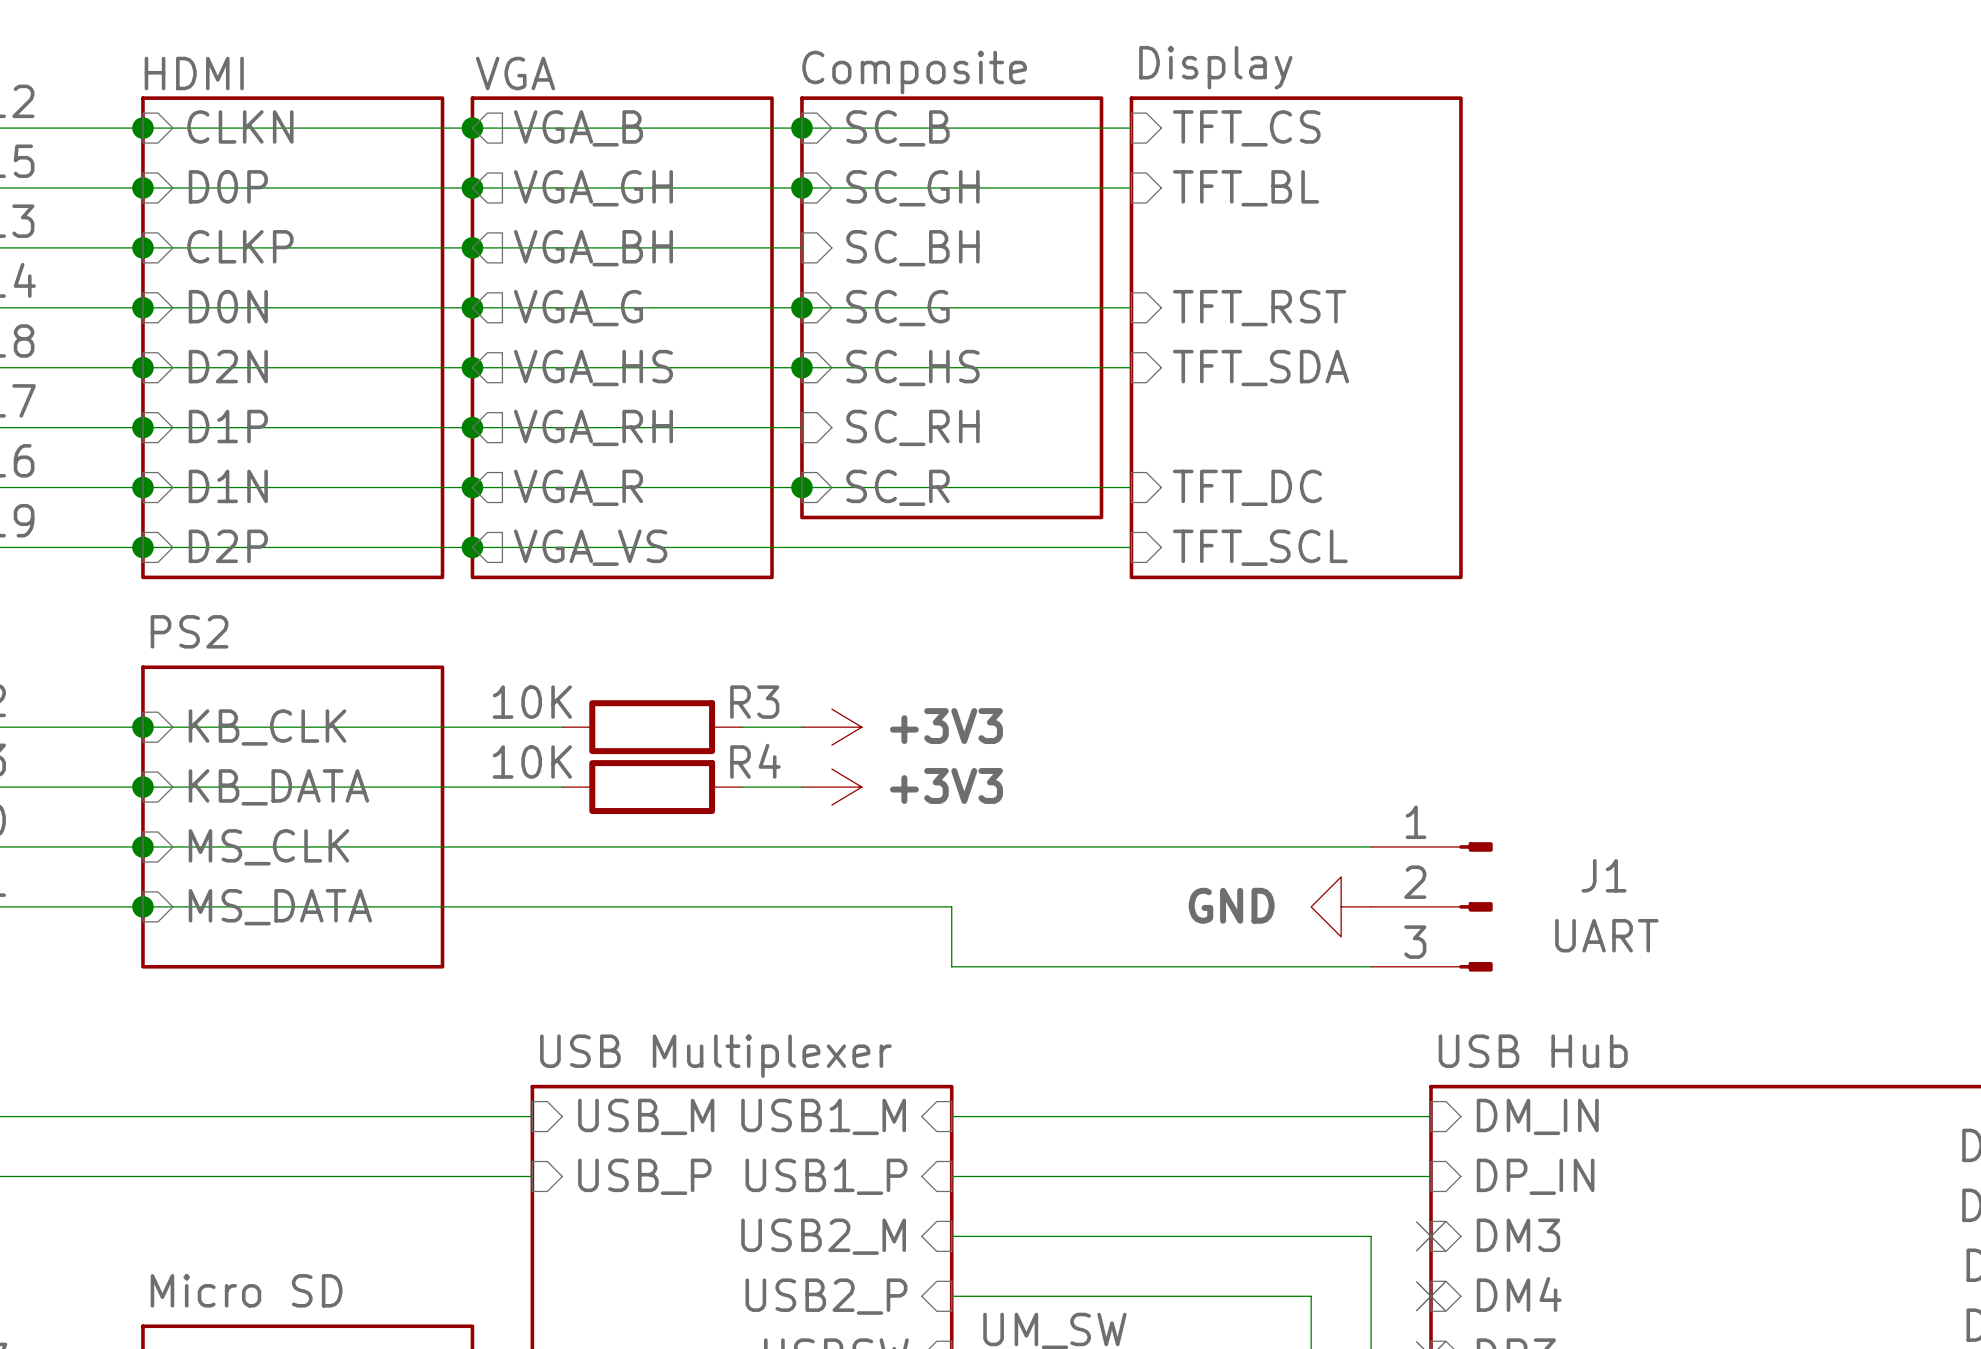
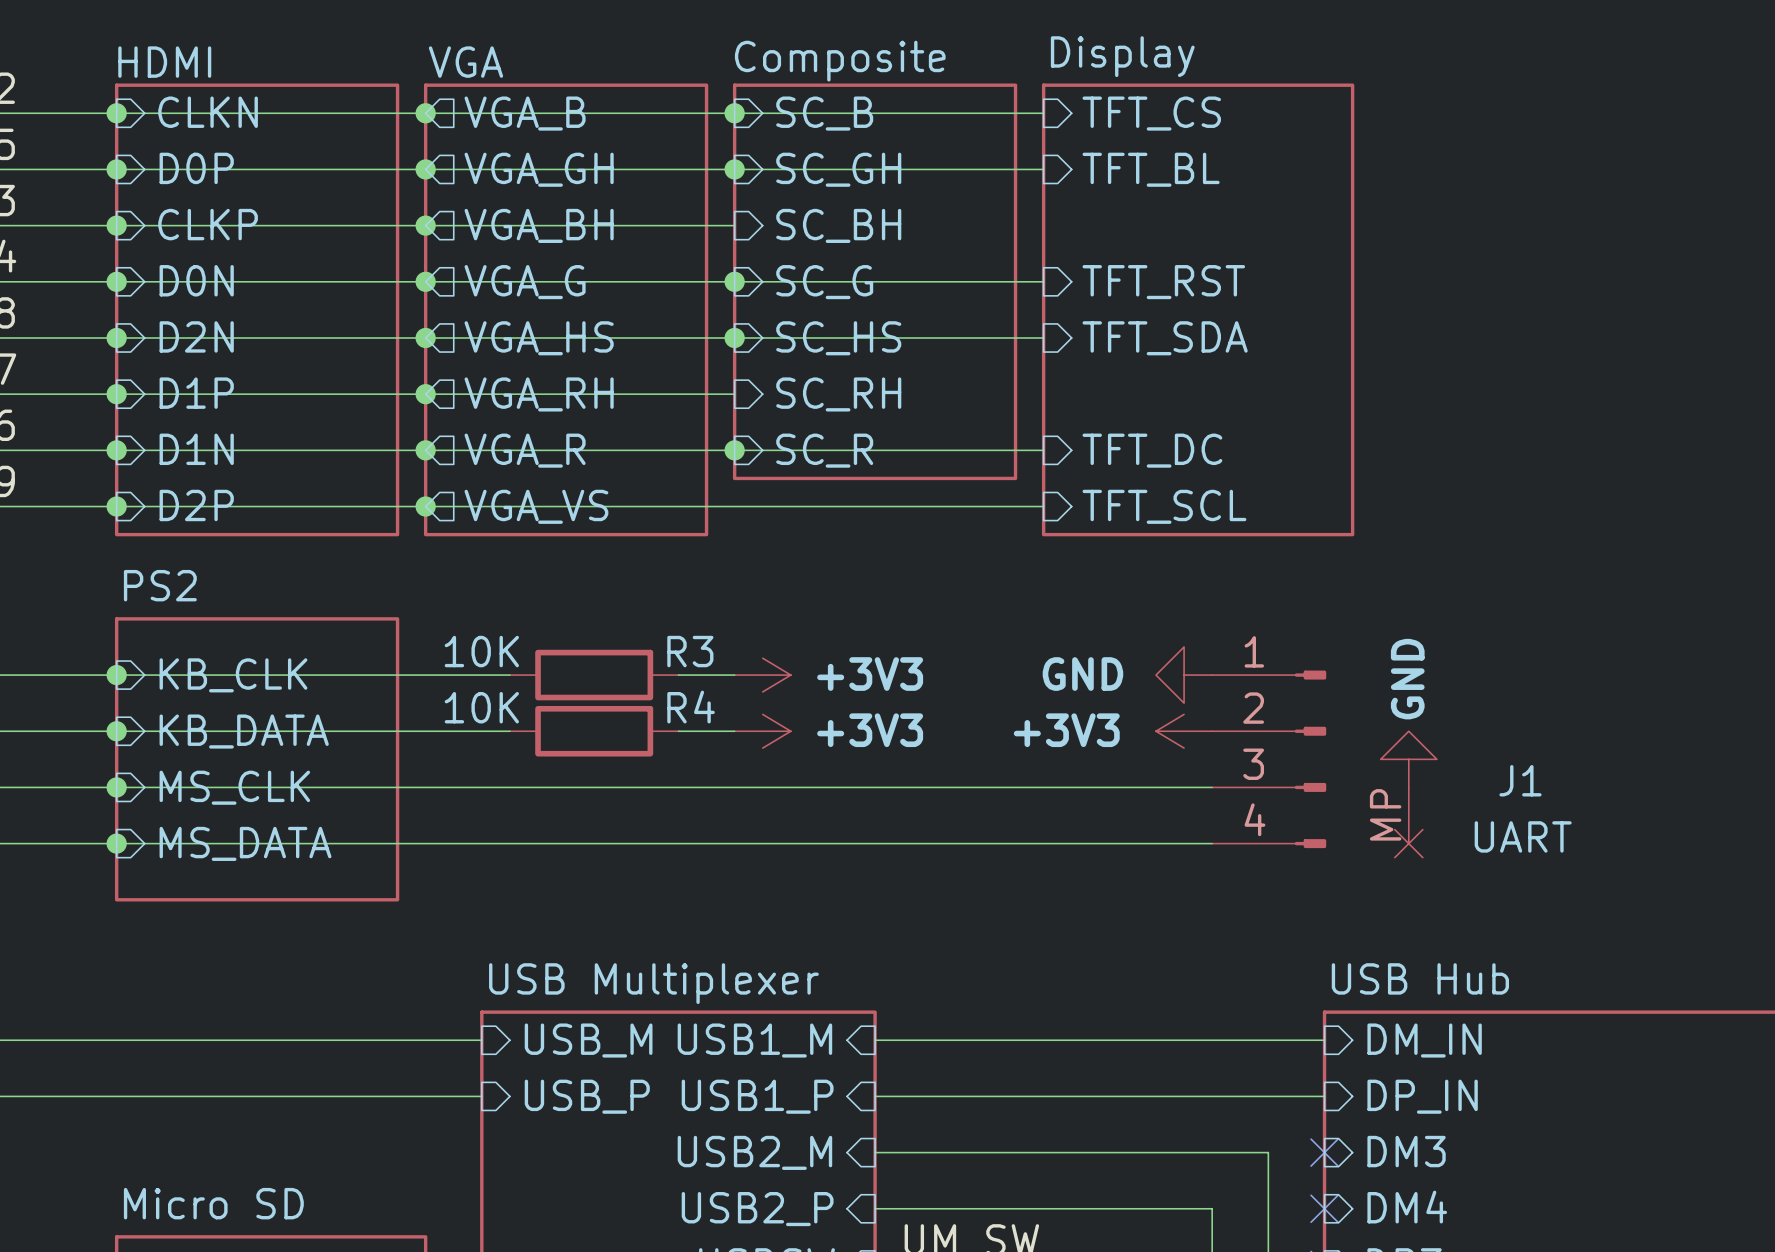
power symbol: none -> GND (1184, 675)
power symbol: none -> +3V3 (1184, 731)
power symbol: none -> GND (1408, 759)
J1 symbol: [1371, 842, 1493, 972] -> [1212, 670, 1423, 858]
J1 name position: J1 (1604, 875) -> J1 (1520, 780)
wire: (951, 906) (951, 966) (1371, 966) -> (875, 843) (1212, 843)
power symbol: GND (1341, 906) -> none
J1 value position: UART (1606, 935) -> UART (1523, 836)

